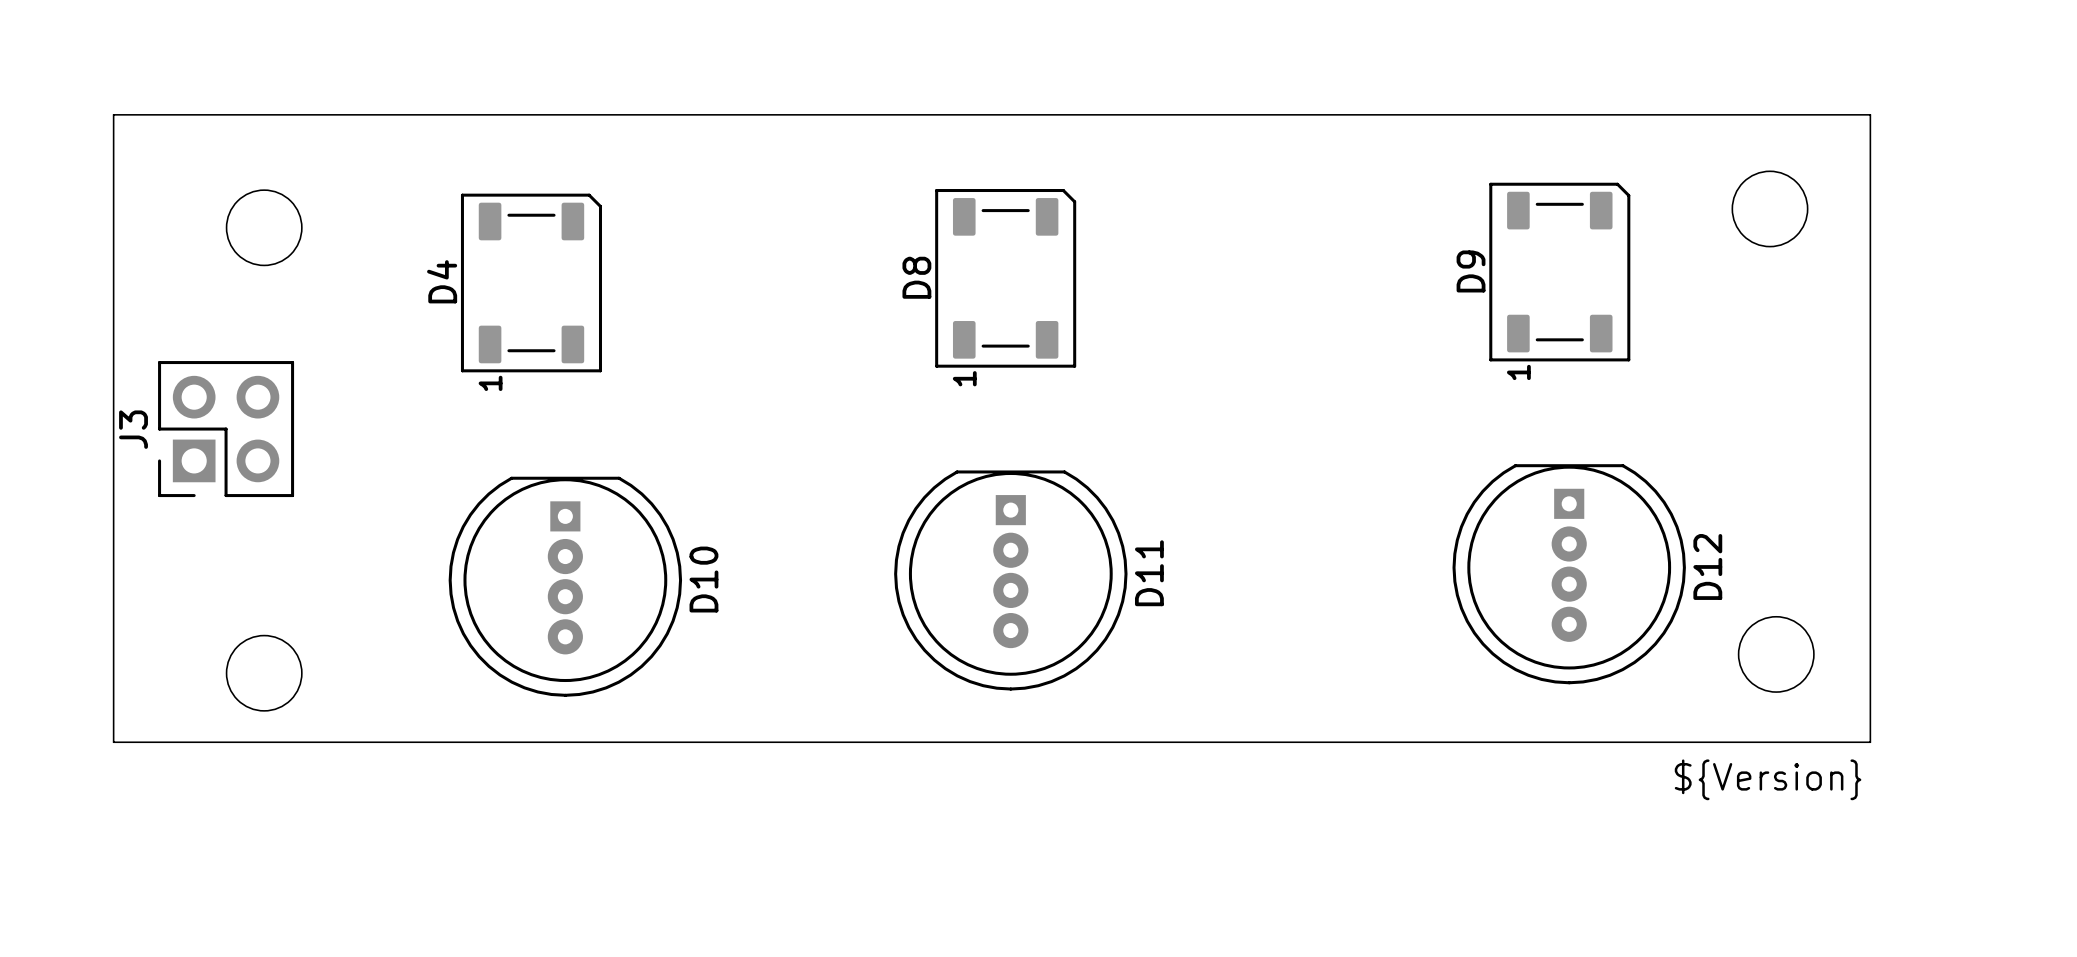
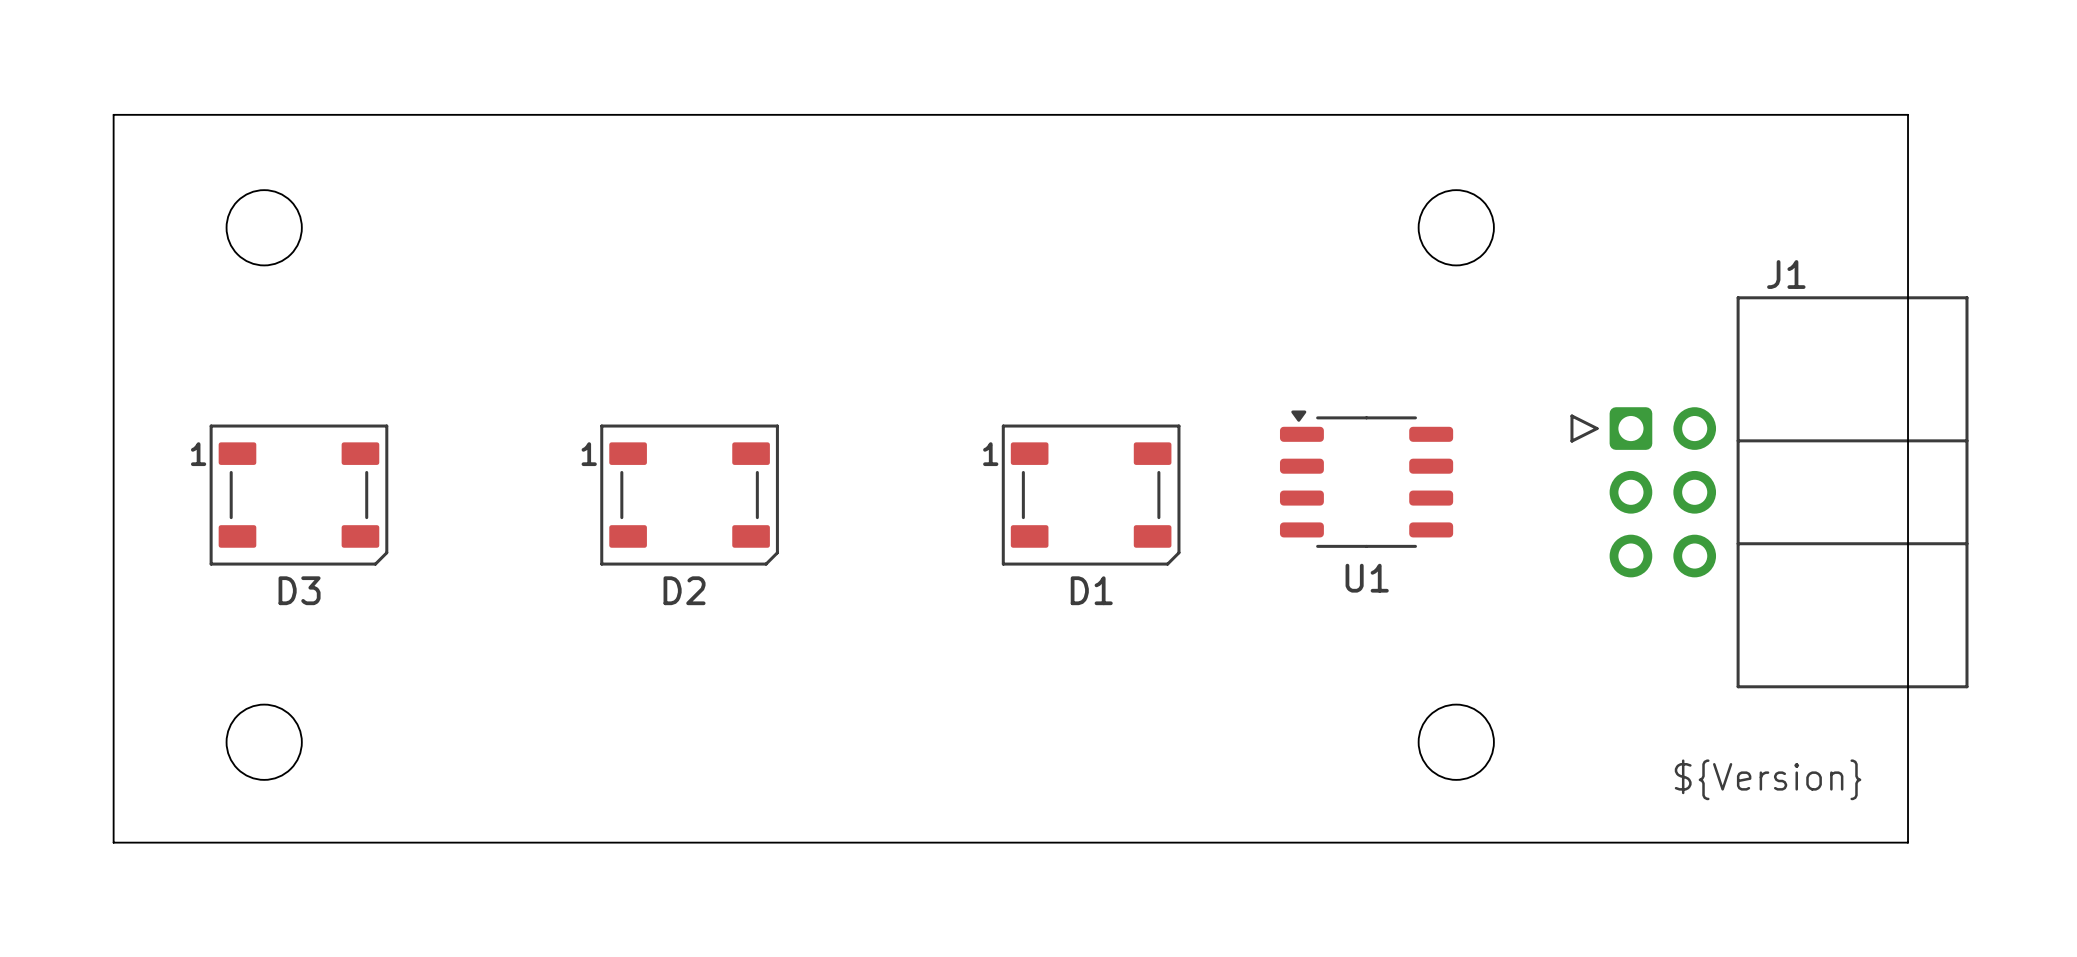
board edge: (1870, 114) (1870, 742) (113, 742) -> (1870, 114) (1908, 114) (1908, 842) (113, 842) (113, 742)
round board edge: [1731, 170, 1809, 248] -> none
round board edge: none -> [1418, 189, 1495, 267]
D9: (1559, 272) -> none
D8: (1005, 278) -> none
D4: (531, 282) -> none
J3: (226, 429) -> none
U1: none -> (1366, 479)
J1: none -> (1769, 492)
D3: none -> (298, 495)
D2: none -> (689, 495)
D1: none -> (1091, 495)
D12: (1569, 574) -> none
D11: (1010, 580) -> none
D10: (565, 586) -> none
round board edge: [1737, 616, 1815, 693] -> none
round board edge position: (264, 673) -> (264, 742)
round board edge: none -> [1418, 703, 1495, 781]

